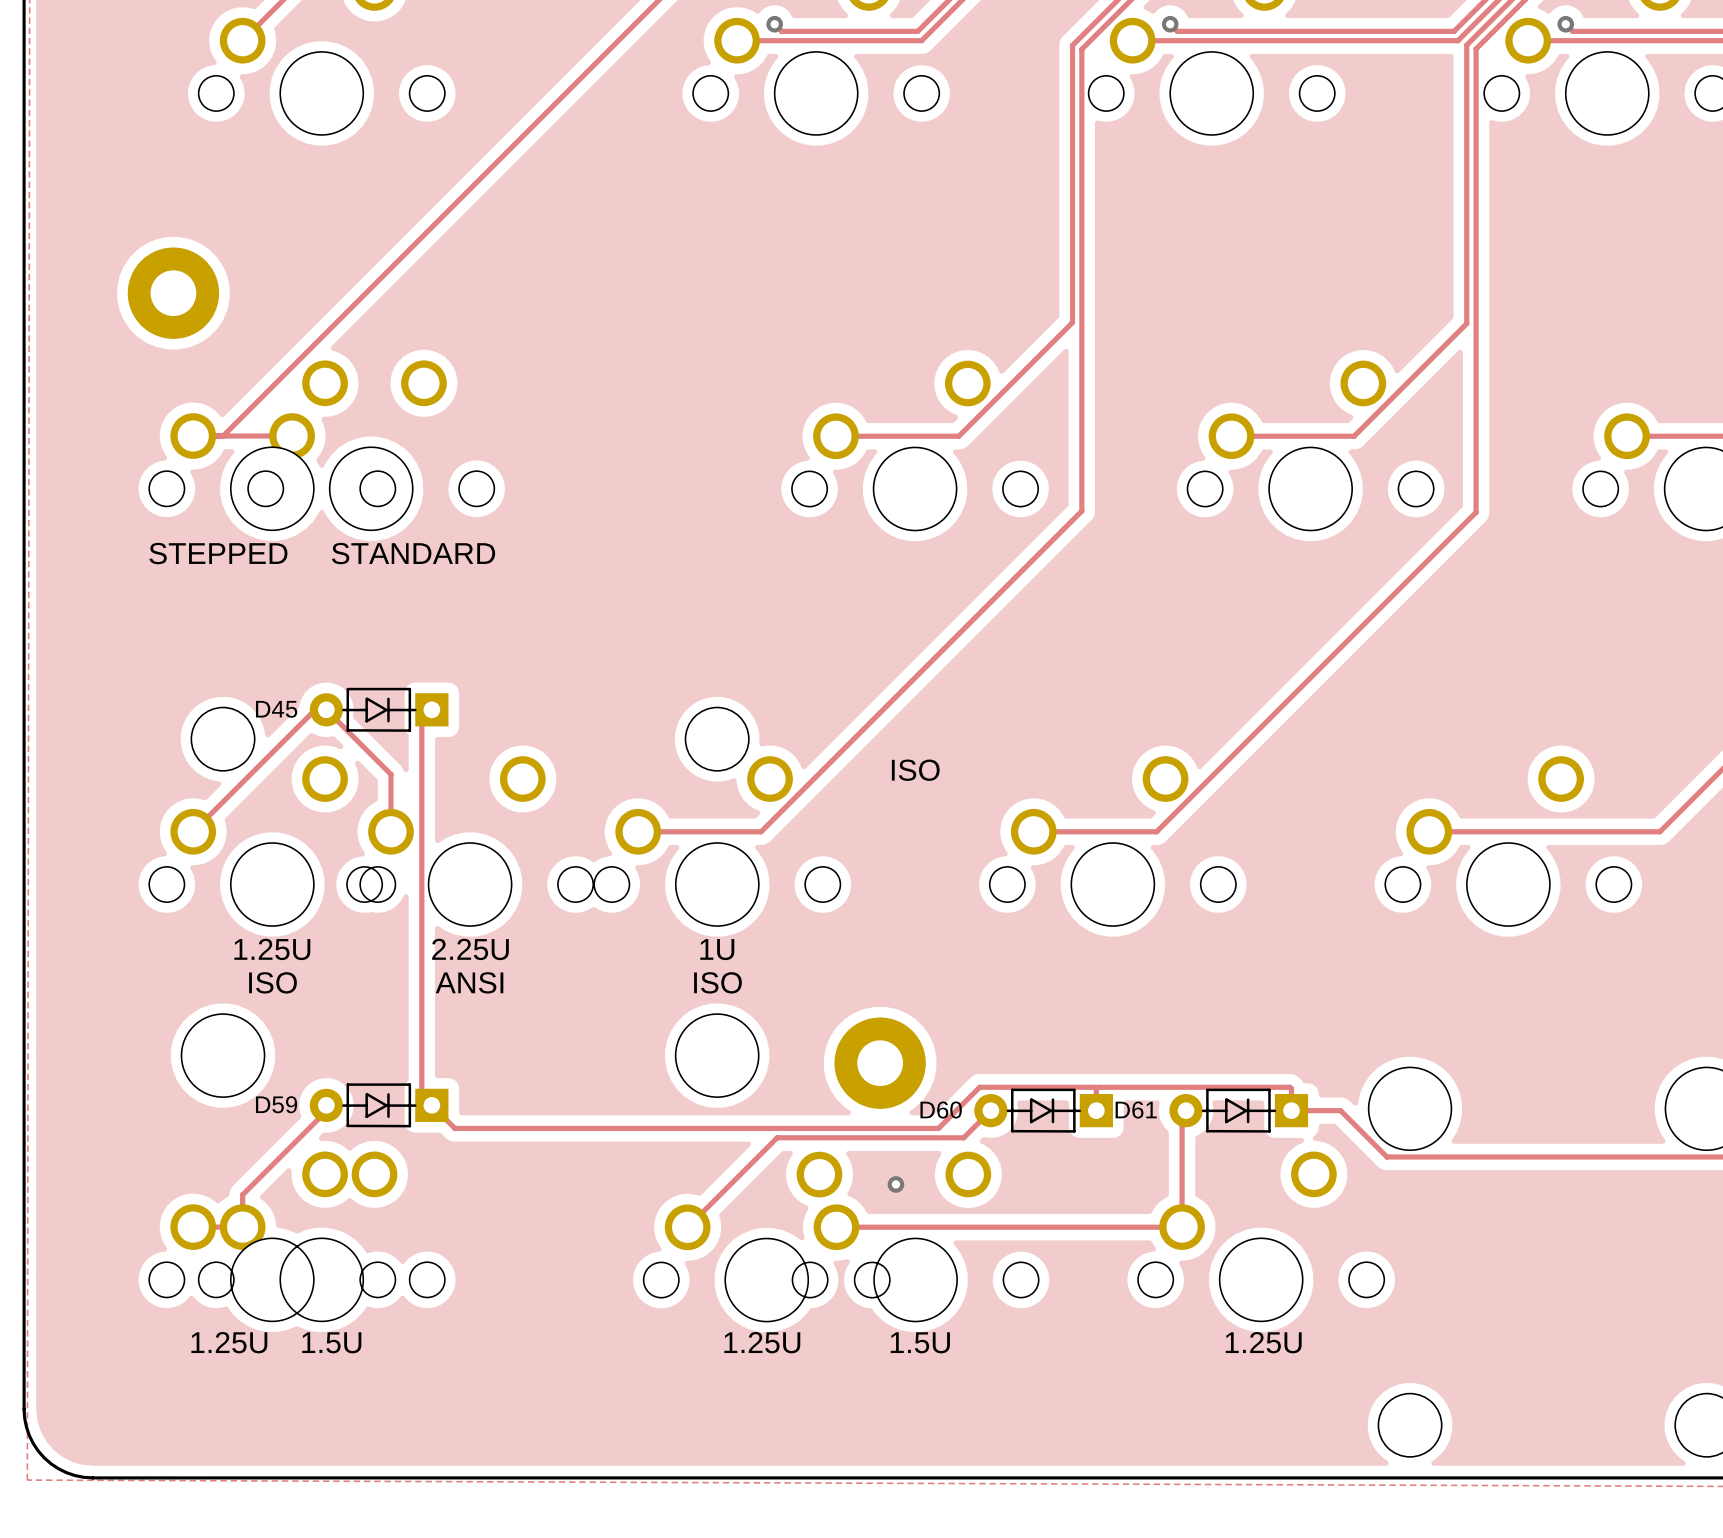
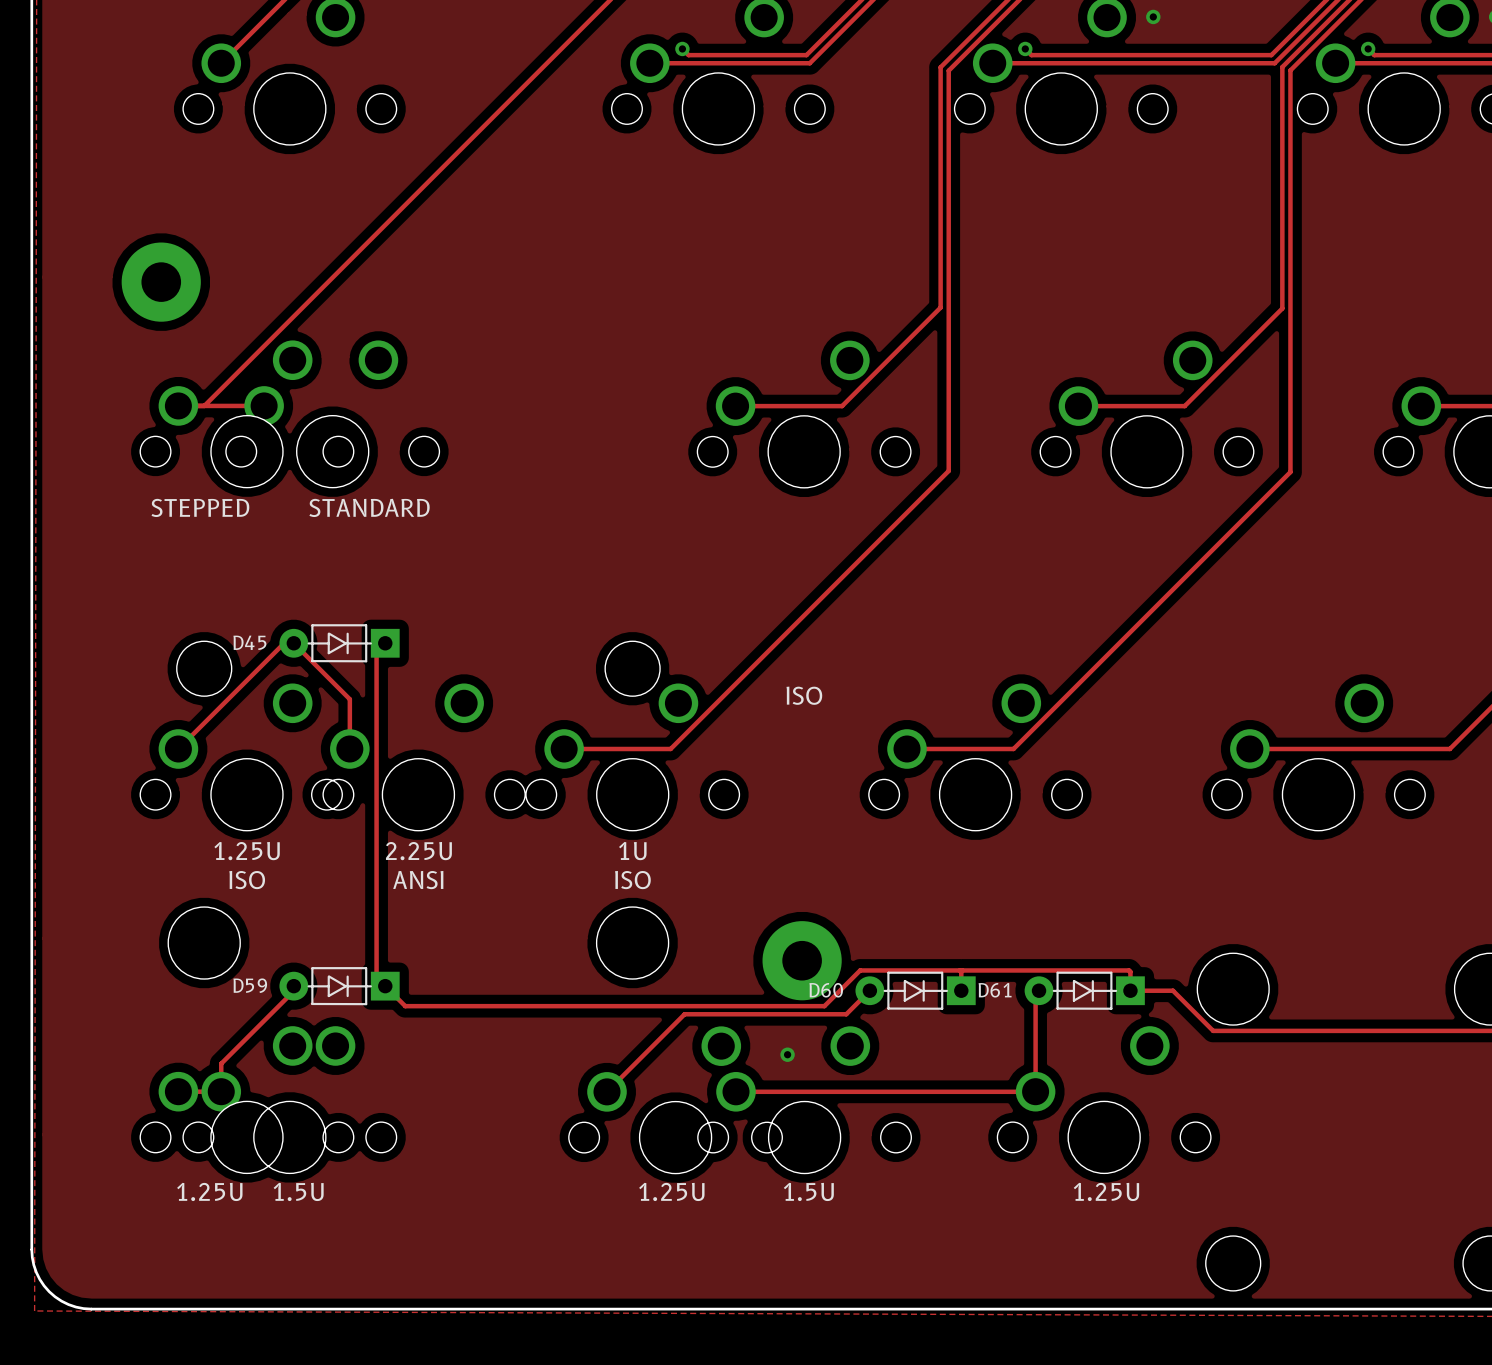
part position: (880, 1063) -> (802, 960)

